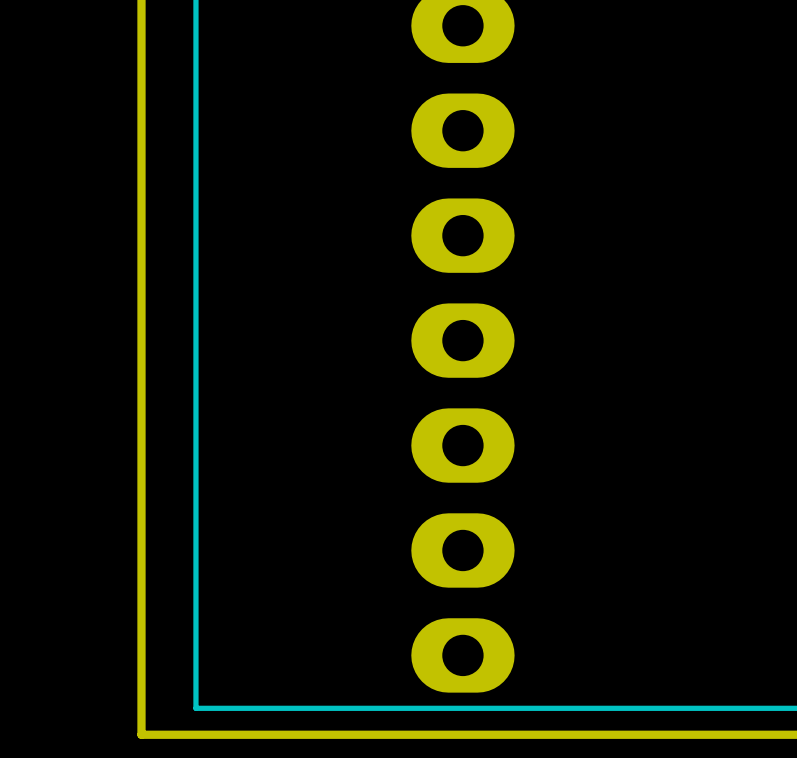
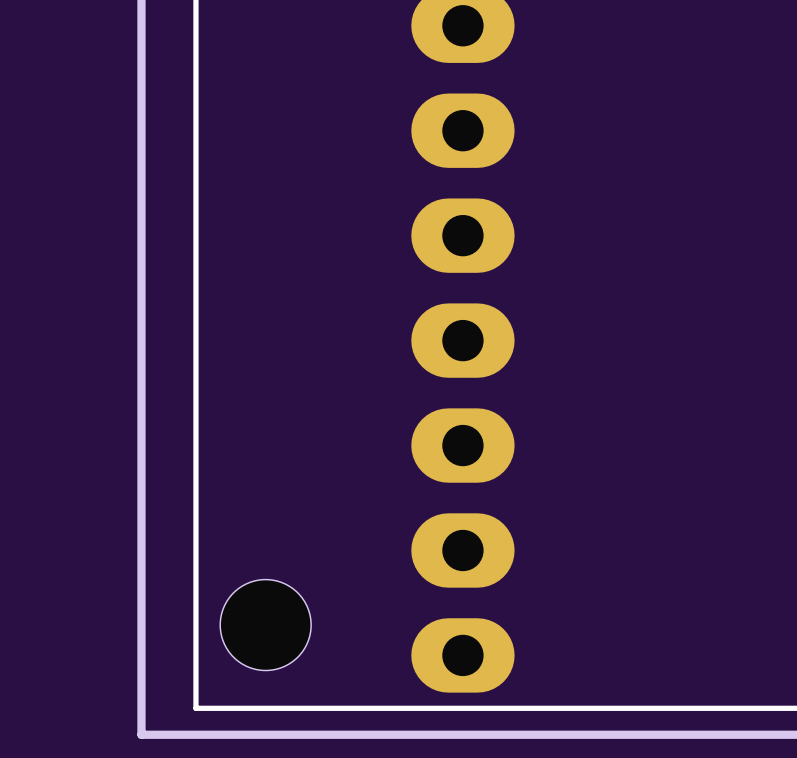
part: none -> (265, 625)

